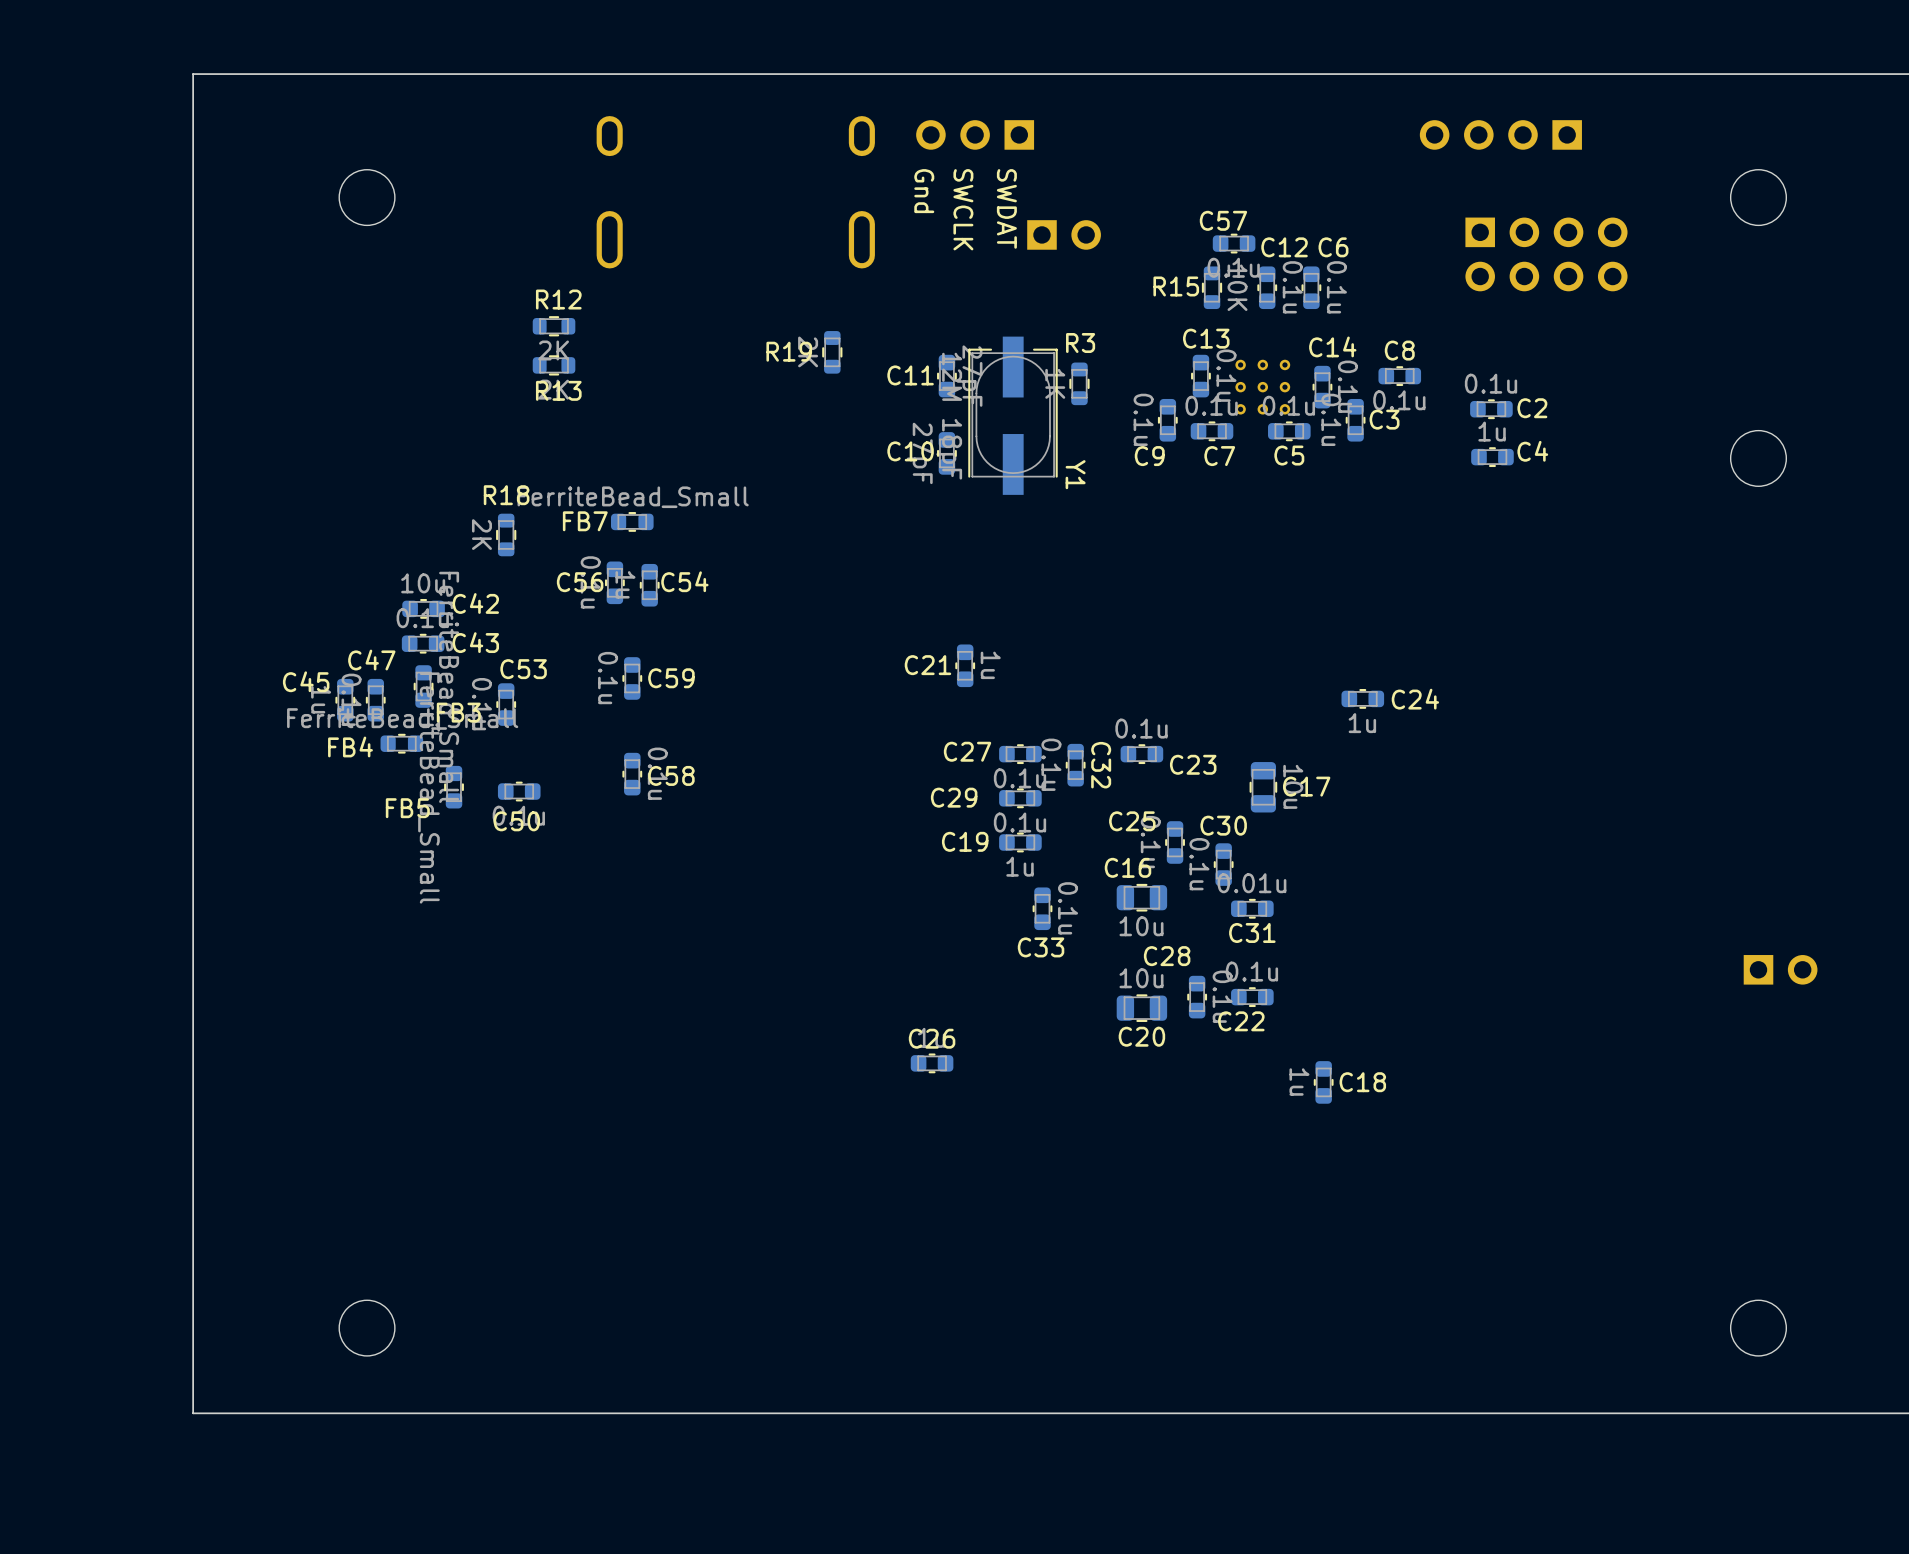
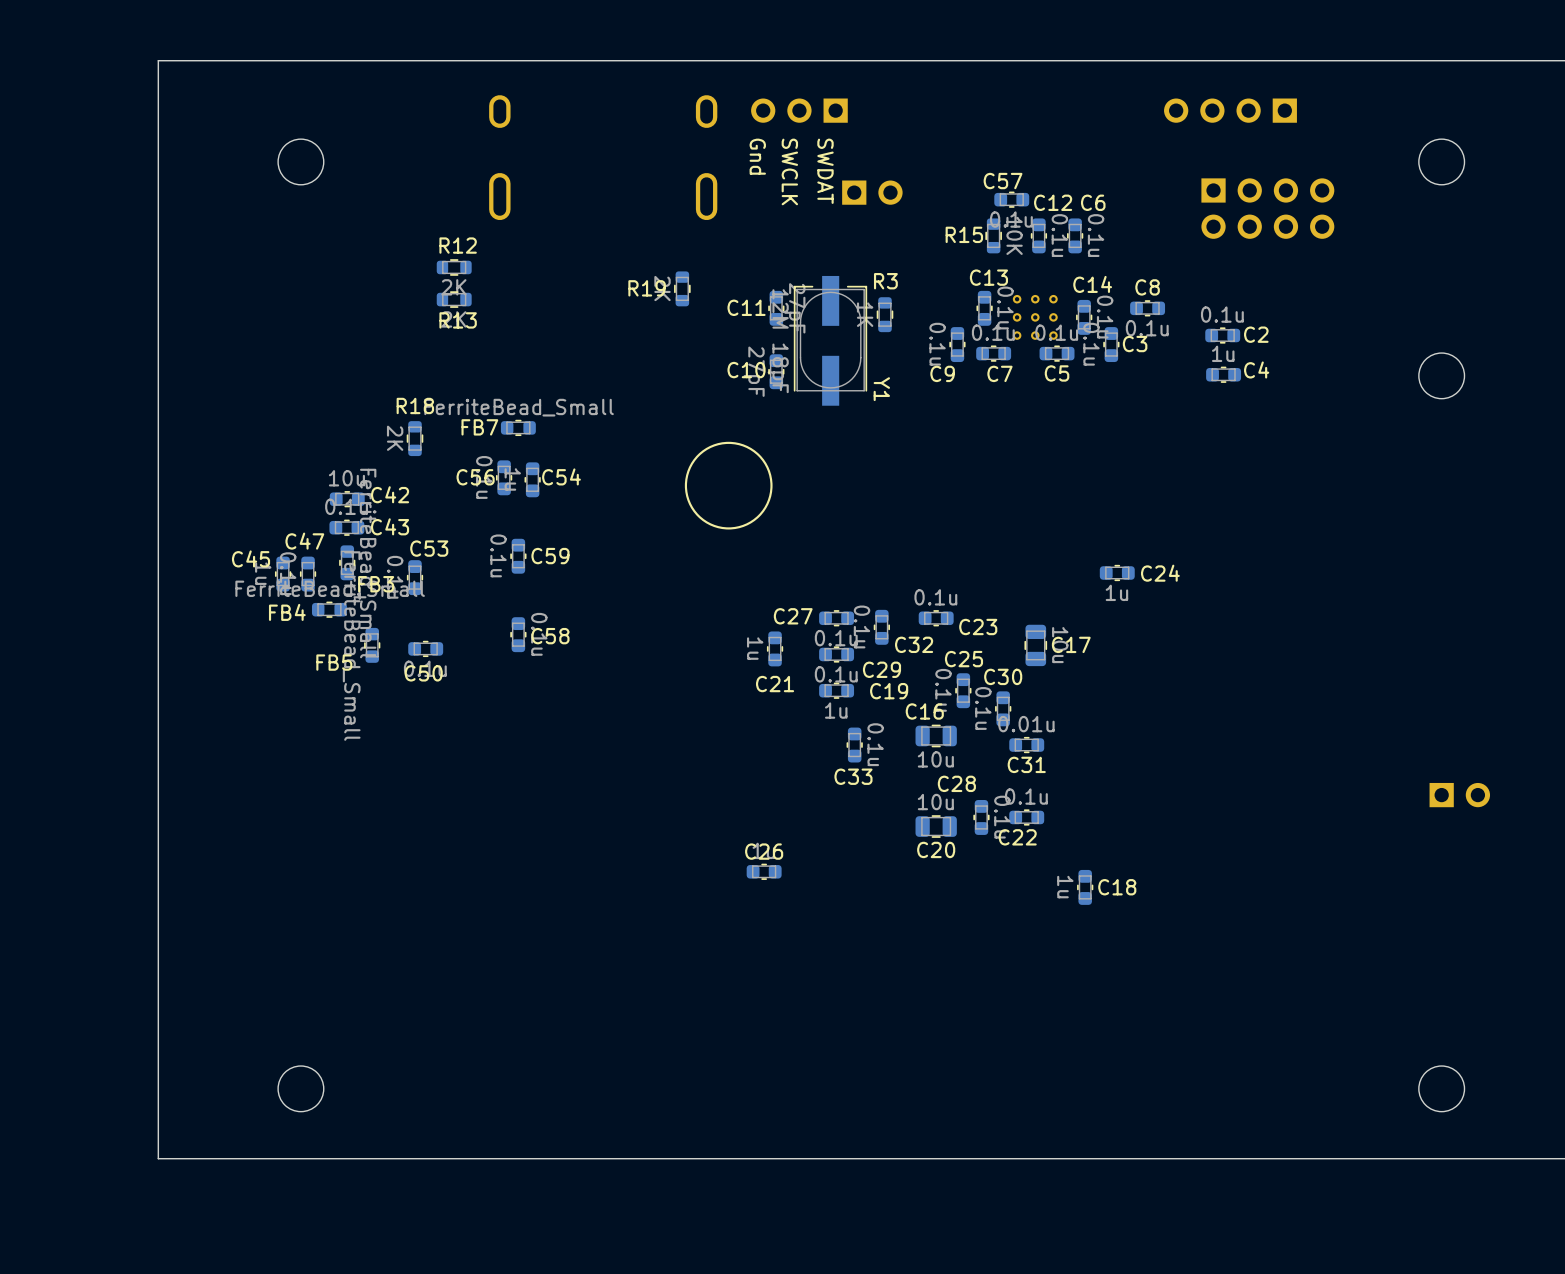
drawing: none -> [684, 441, 773, 530]
C21 name position: C21 (927, 665) -> C21 (775, 684)
C21 position: (965, 665) -> (775, 648)
C21 value position: 1u (990, 665) -> 1u (755, 648)
C32 name rotation: 0° (1101, 765) -> 90° counterclockwise (914, 644)
C29 name position: C29 (954, 797) -> C29 (881, 669)
C25 name position: C25 (1132, 821) -> C25 (963, 659)
C19 name position: C19 (965, 841) -> C19 (889, 691)

